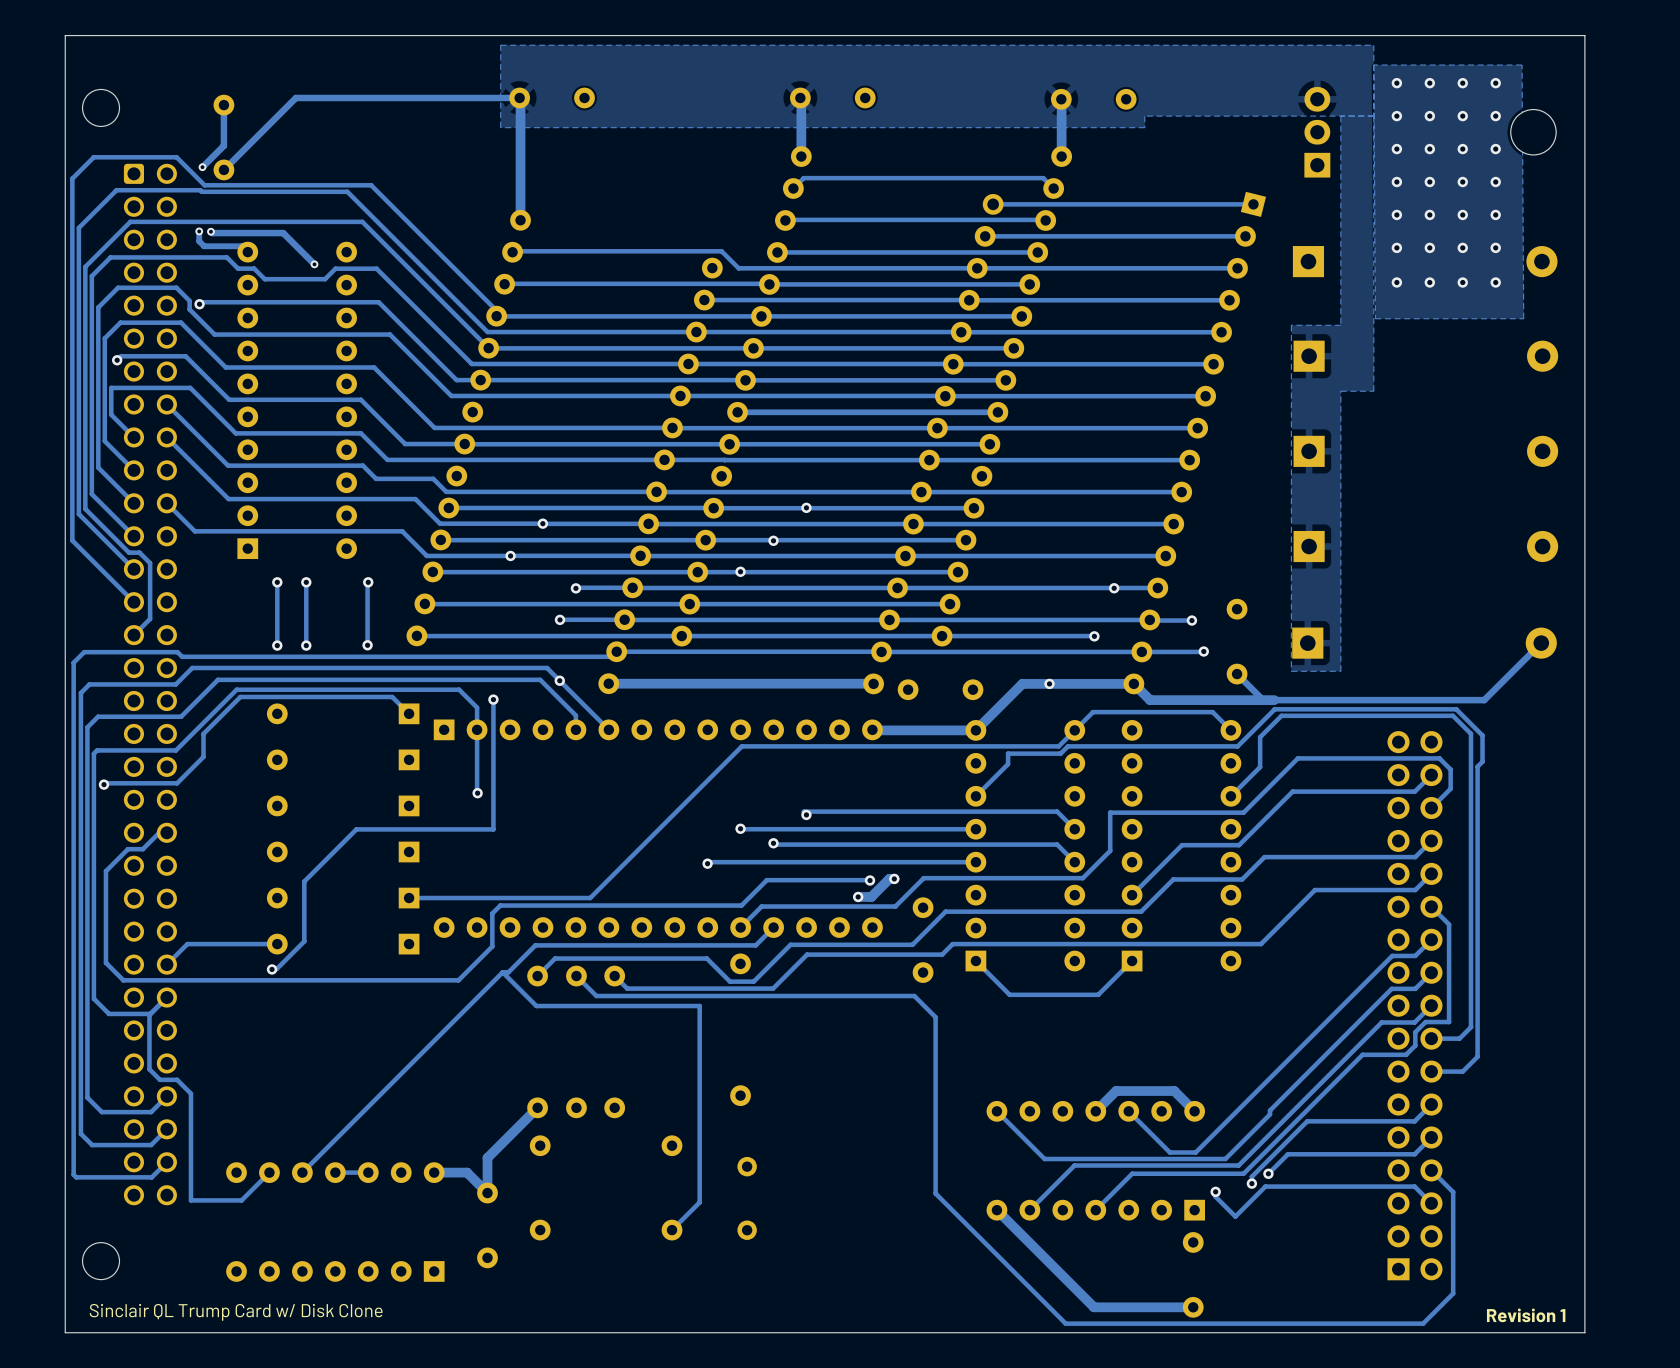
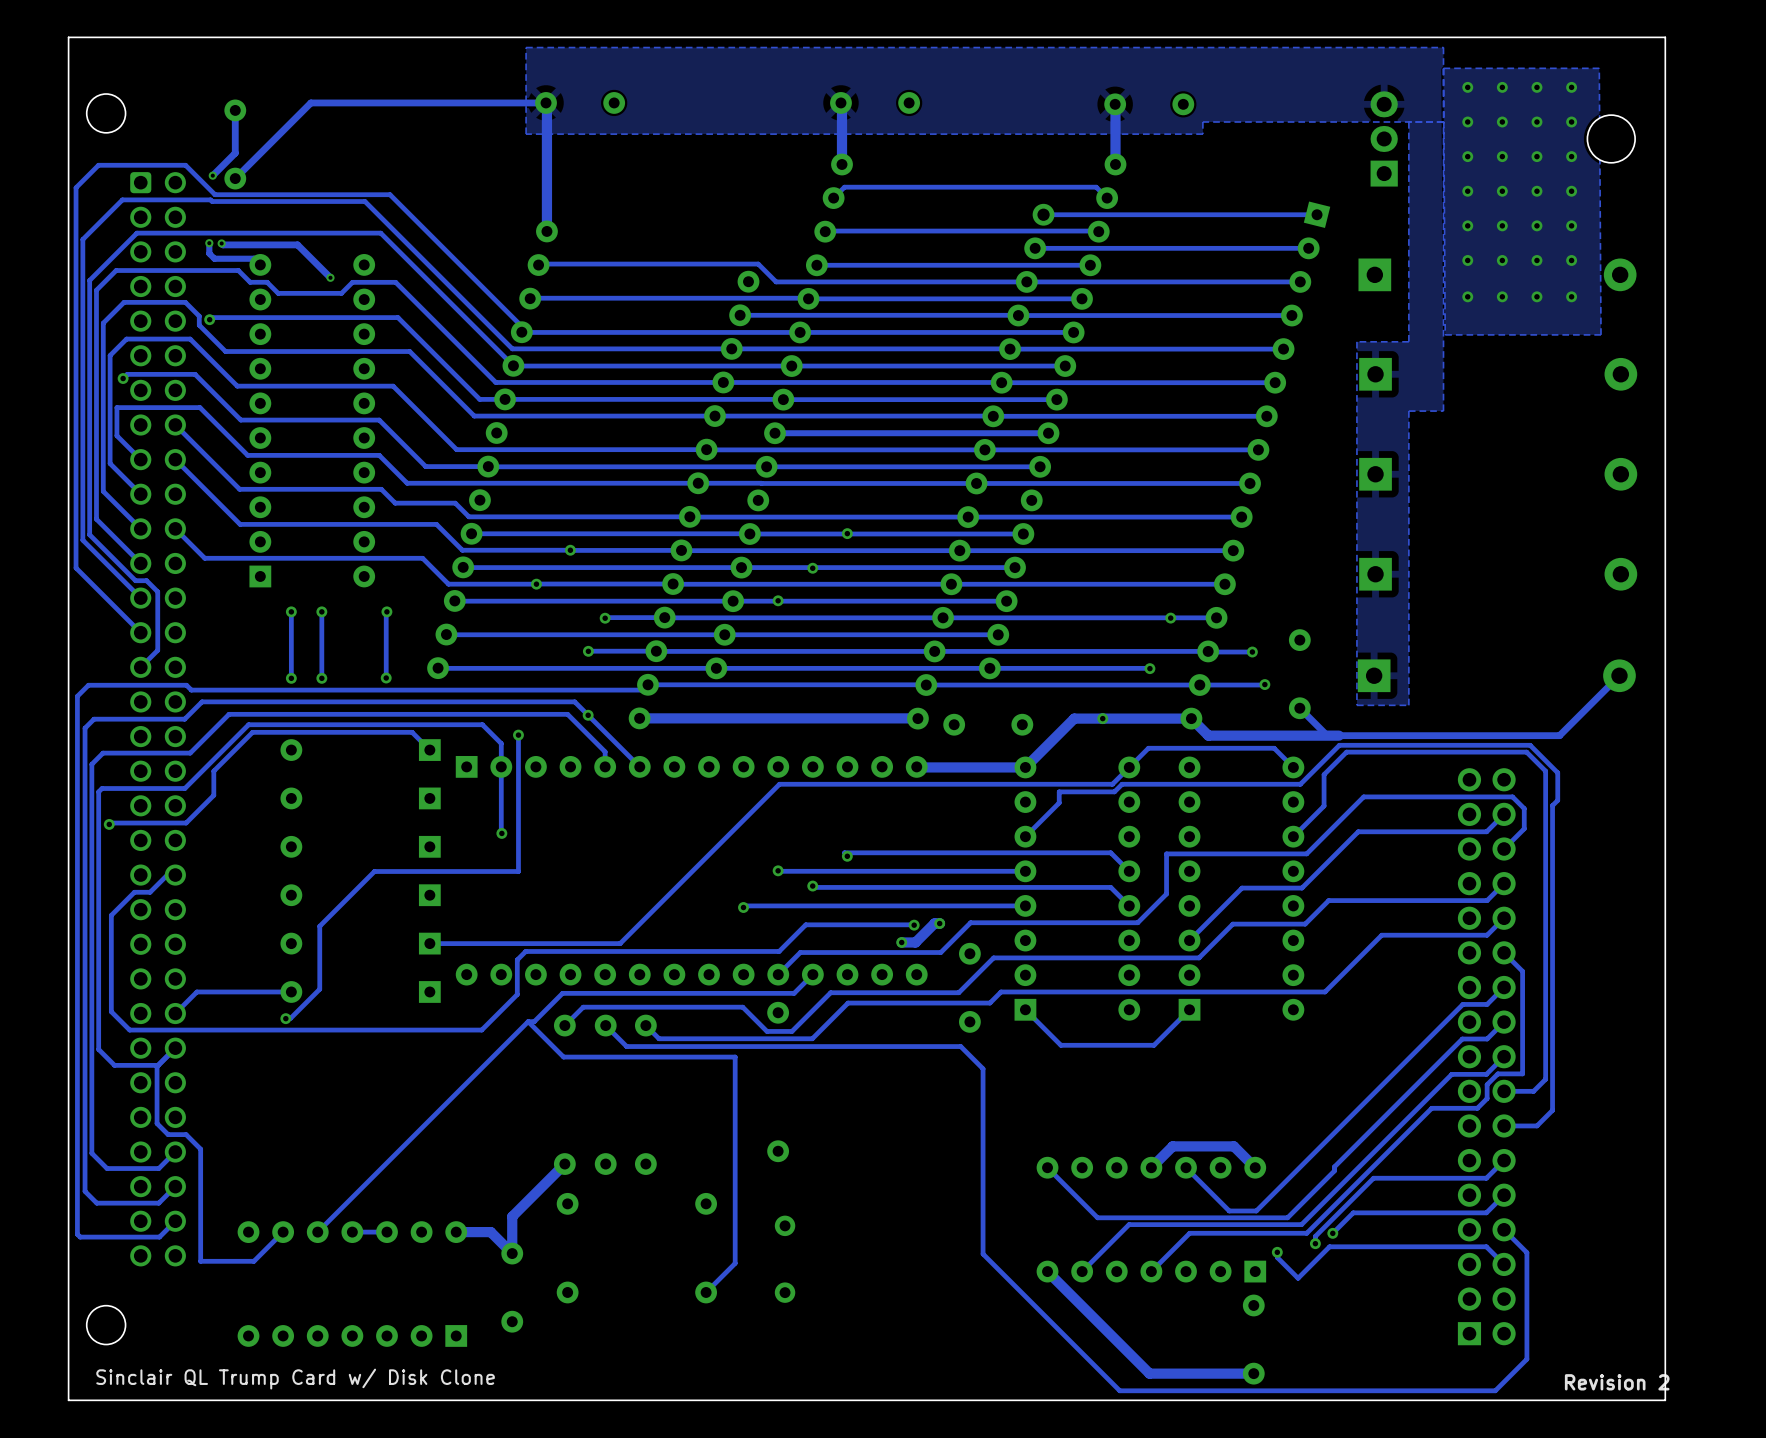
text: Revision 1 (1526, 1315) -> Revision 2 (1617, 1382)

